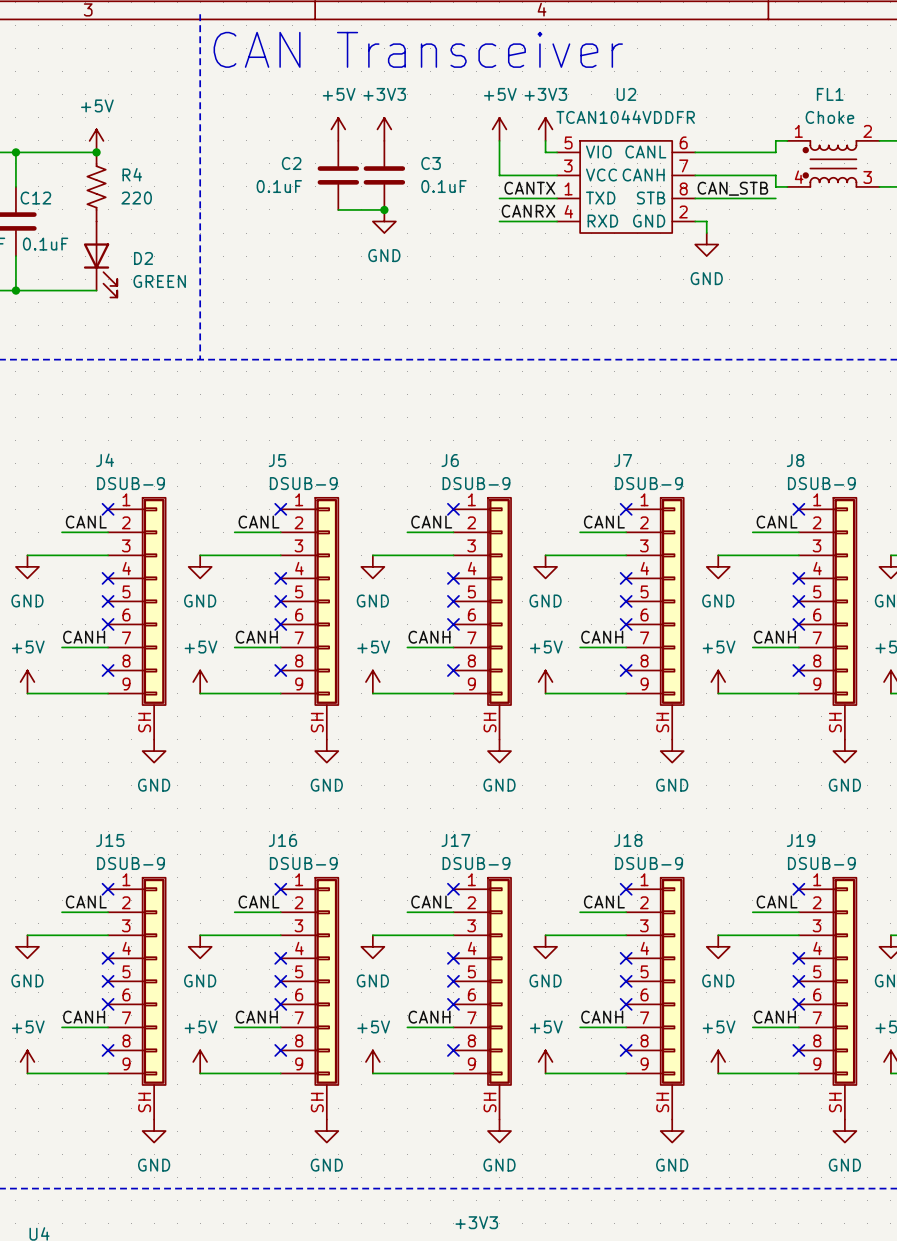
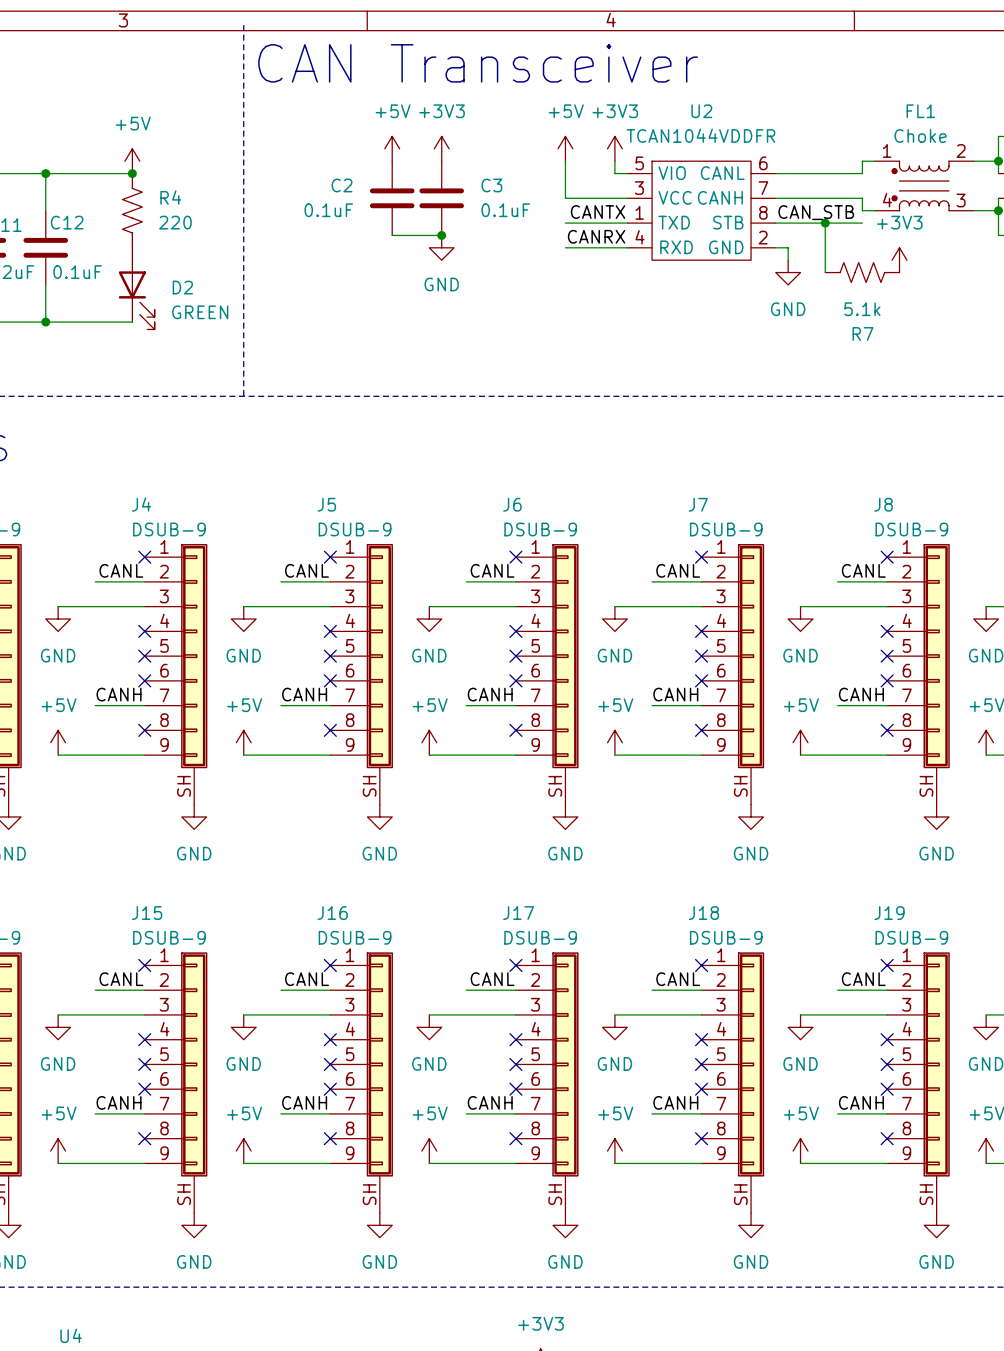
wire: none -> (825, 223) (825, 272)
junction: none -> (825, 223)
power symbol: none -> +3V3 (899, 260)
R7: none -> 5.1k (862, 272)

